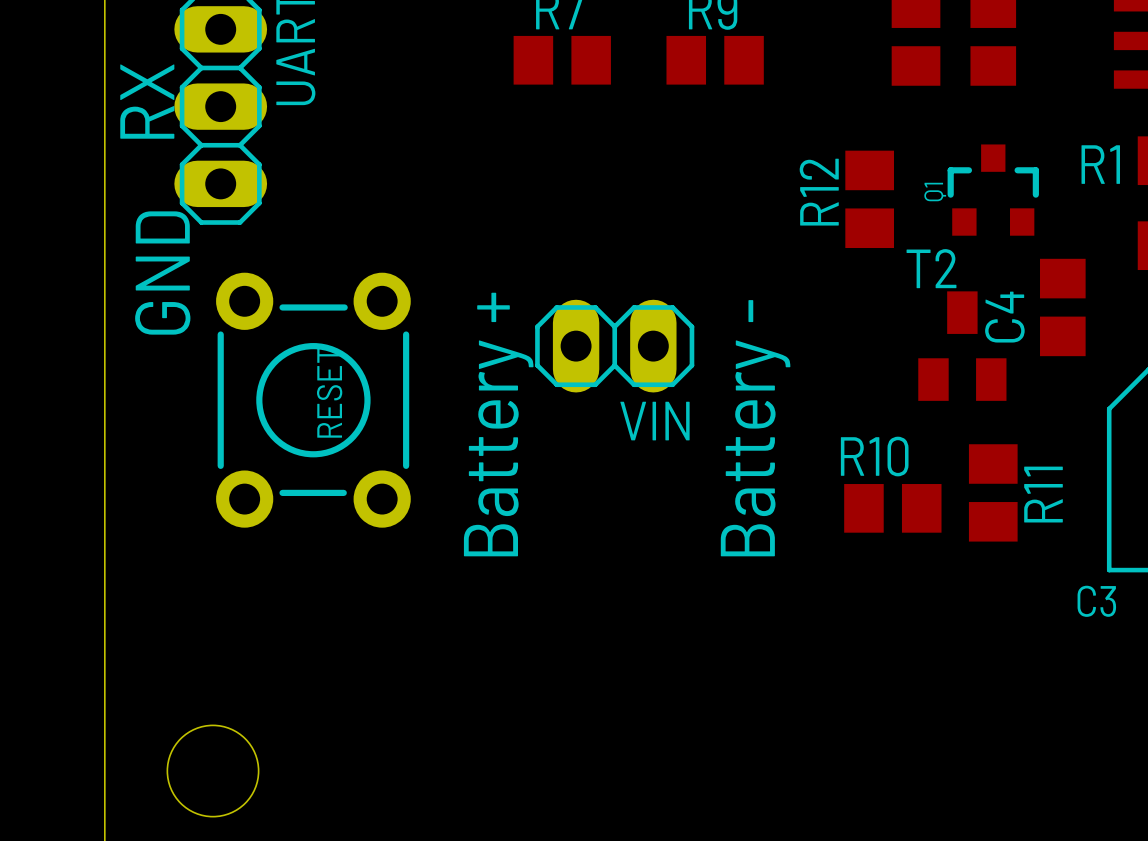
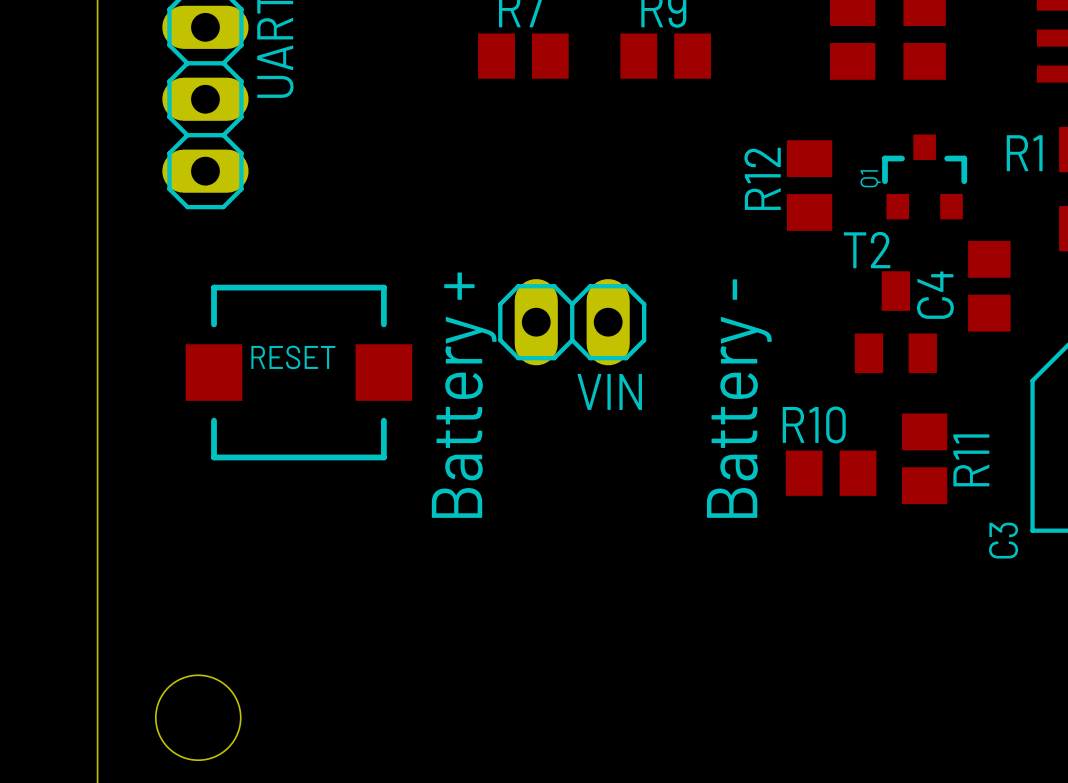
text: RX (147, 101) -> none
RESET footprint: [216, 272, 411, 528] -> [185, 284, 413, 461]
text: GND (162, 273) -> none
text position: Battery - (755, 428) -> Battery - (739, 398)
C3 name rotation: 0° (1096, 601) -> 90° counterclockwise (1003, 540)

